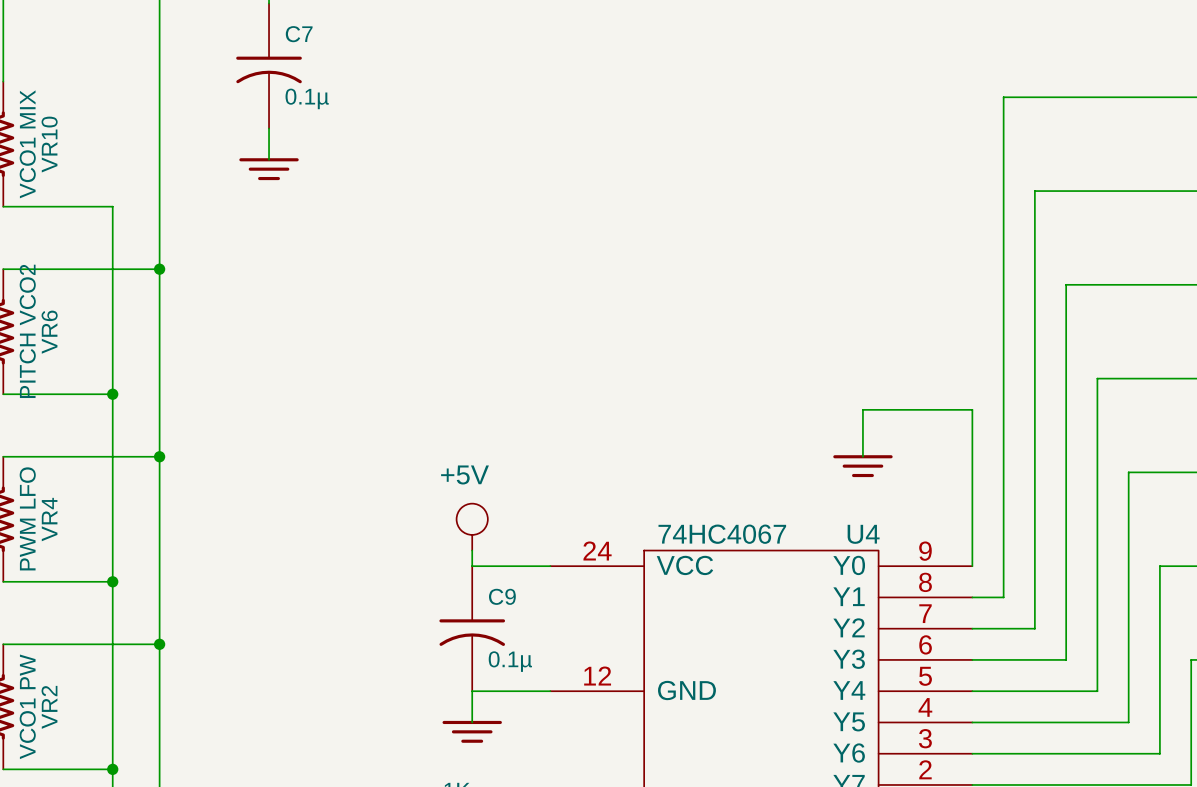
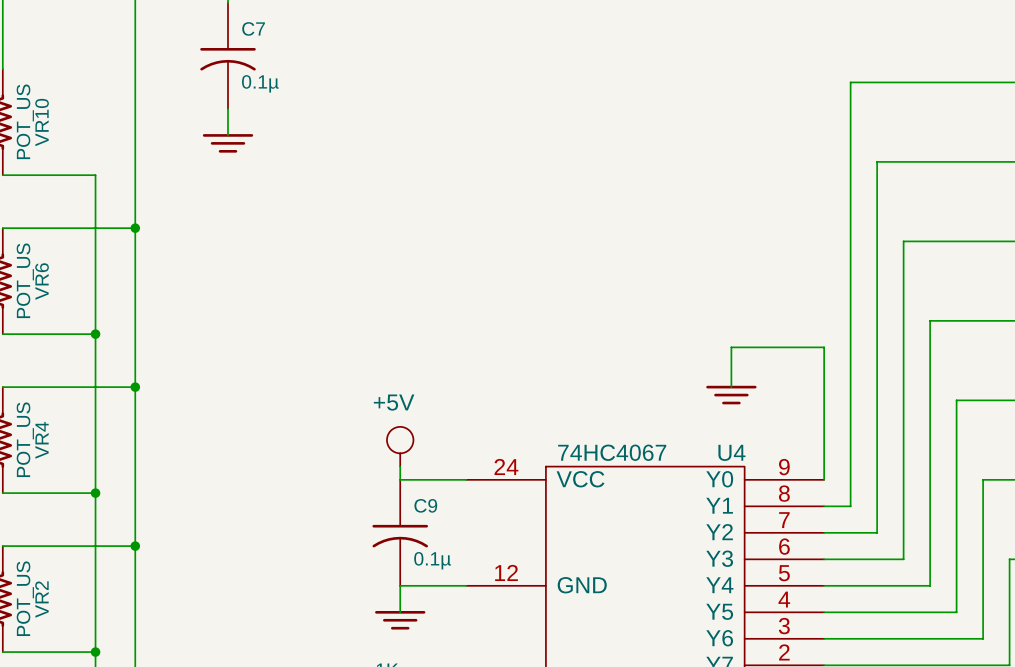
VR10 value: VCO1 MIX (27, 144) -> POT_US (25, 121)
VR6 value: PITCH VCO2 (27, 331) -> POT_US (25, 280)
VR4 value: PWM LFO (27, 518) -> POT_US (25, 439)
VR2 value: VCO1 PW (27, 706) -> POT_US (25, 598)

